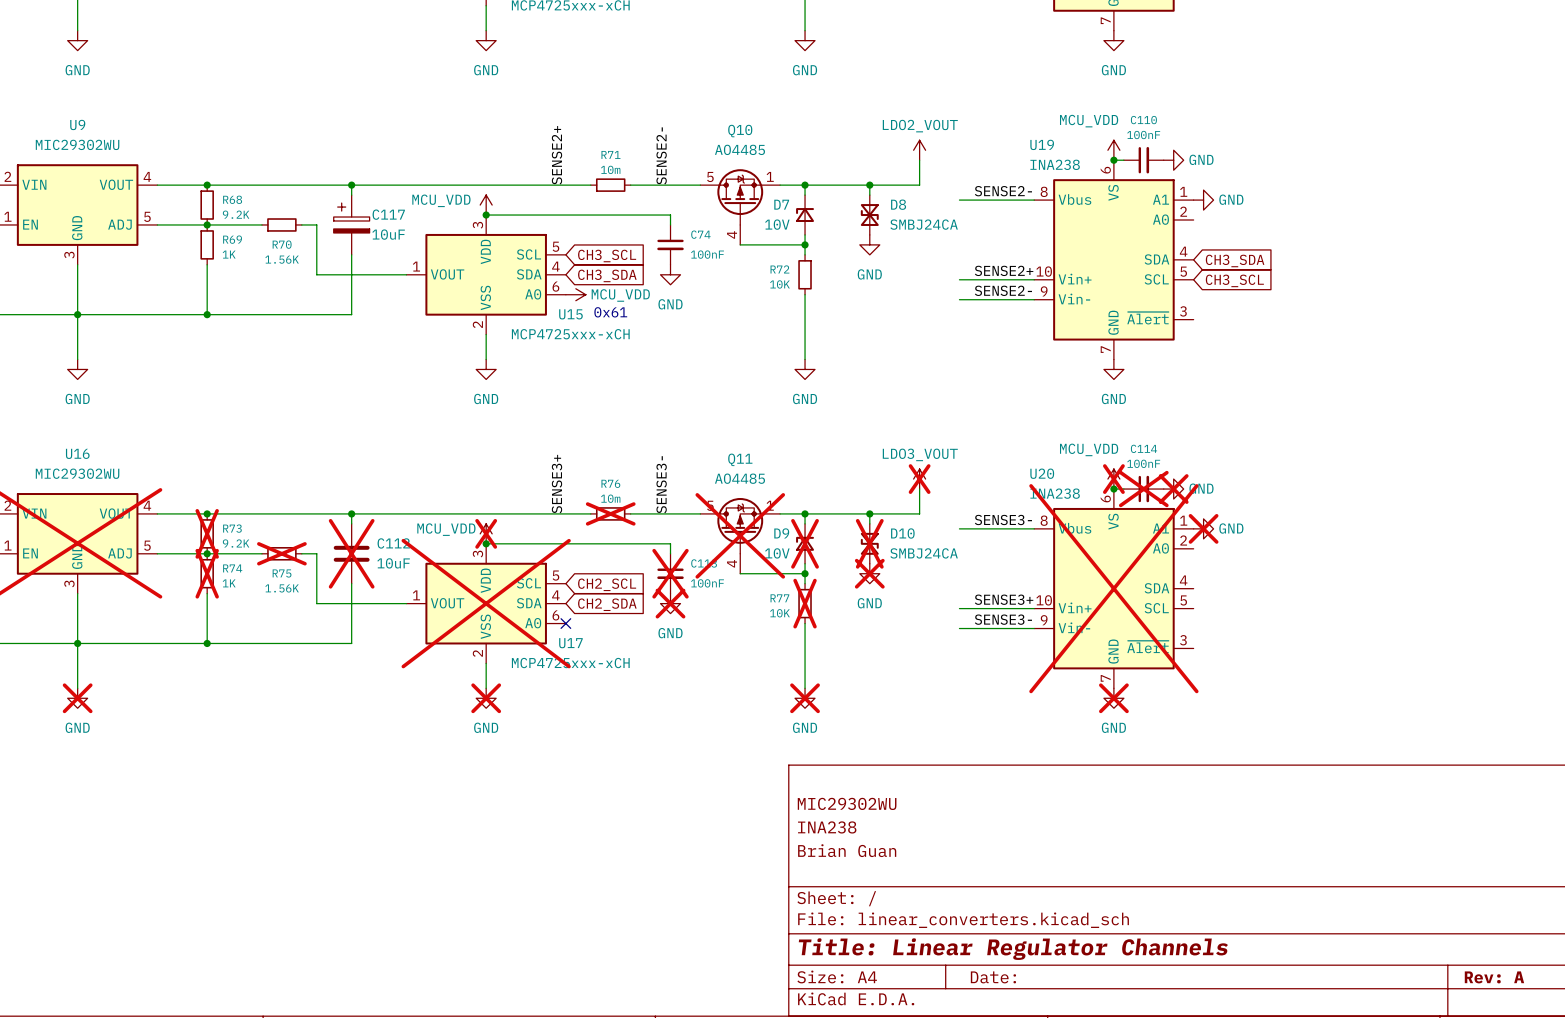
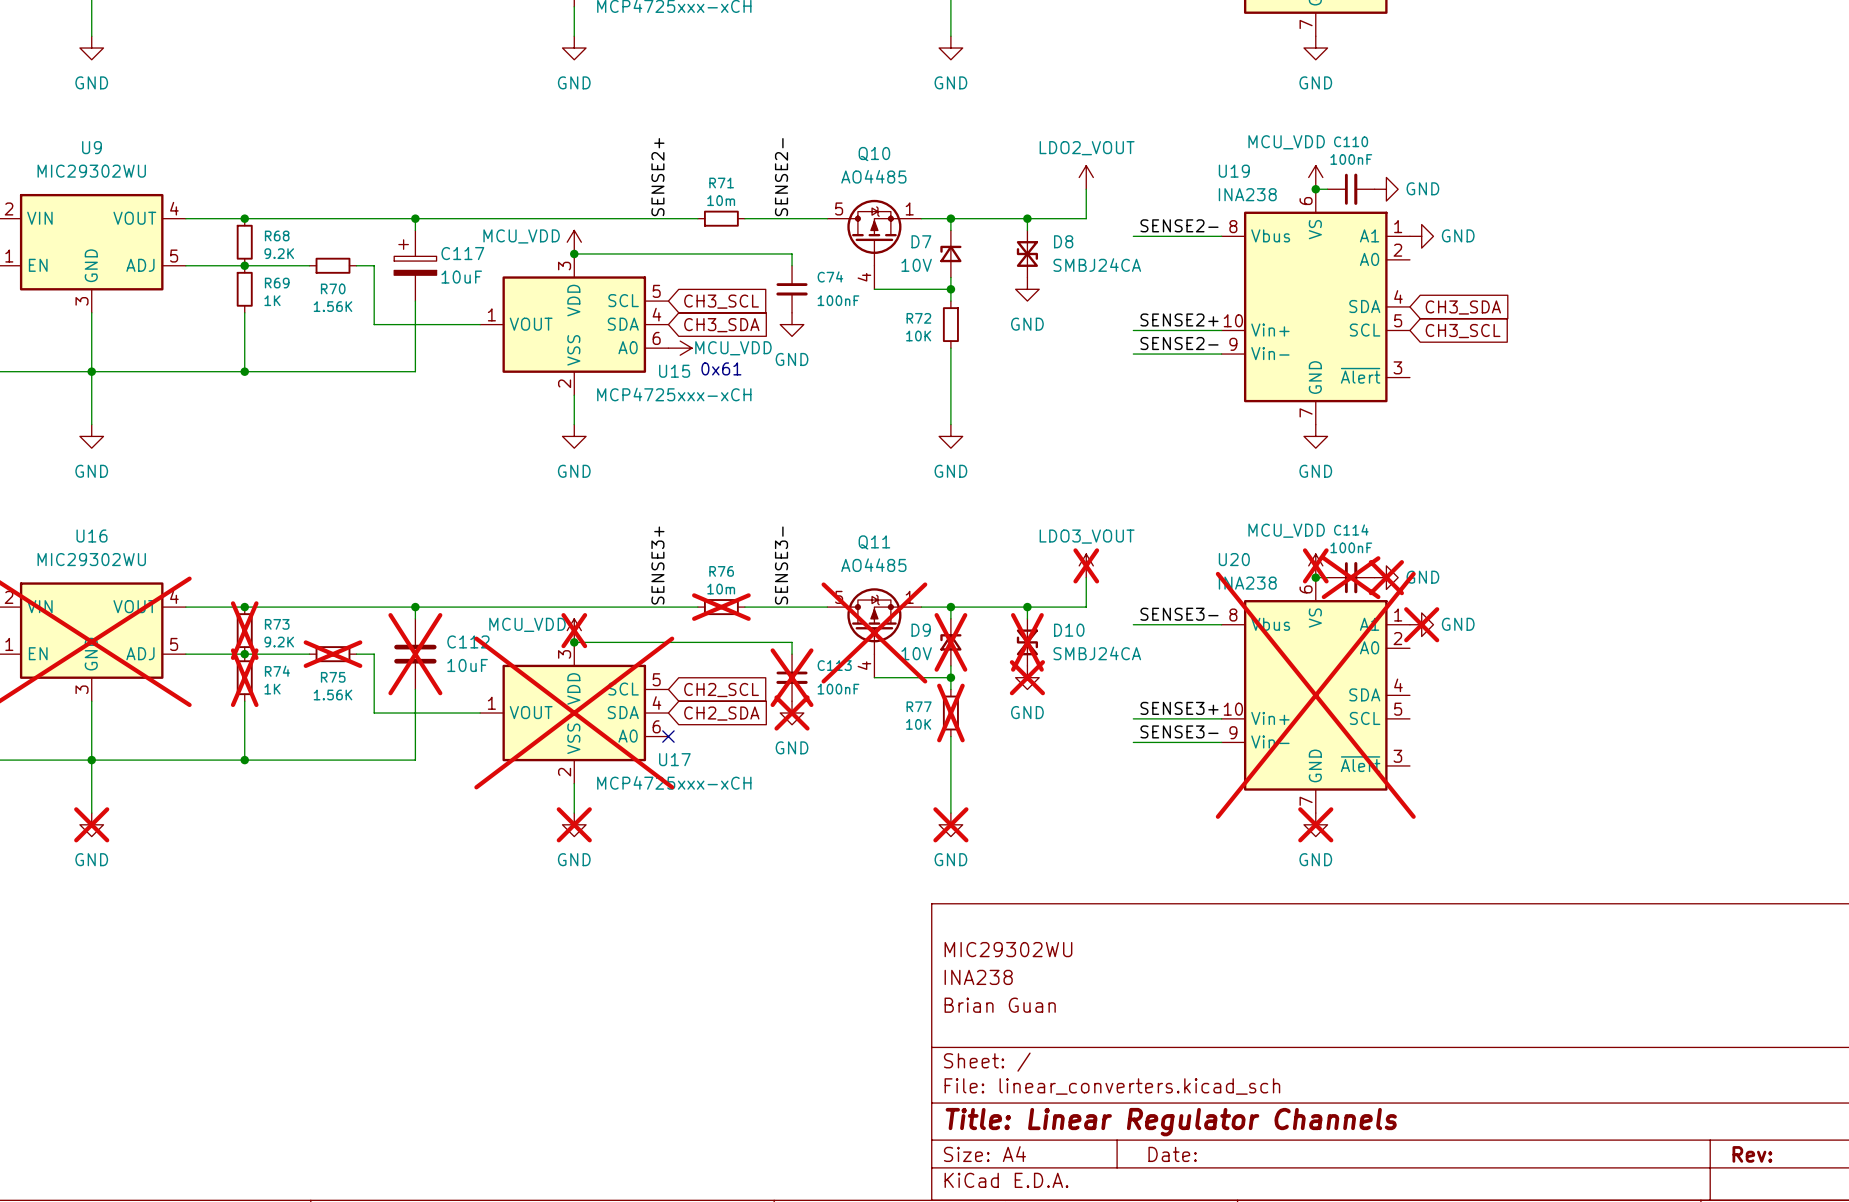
title block: Rev: A (1494, 977) -> Rev: (1752, 1154)

